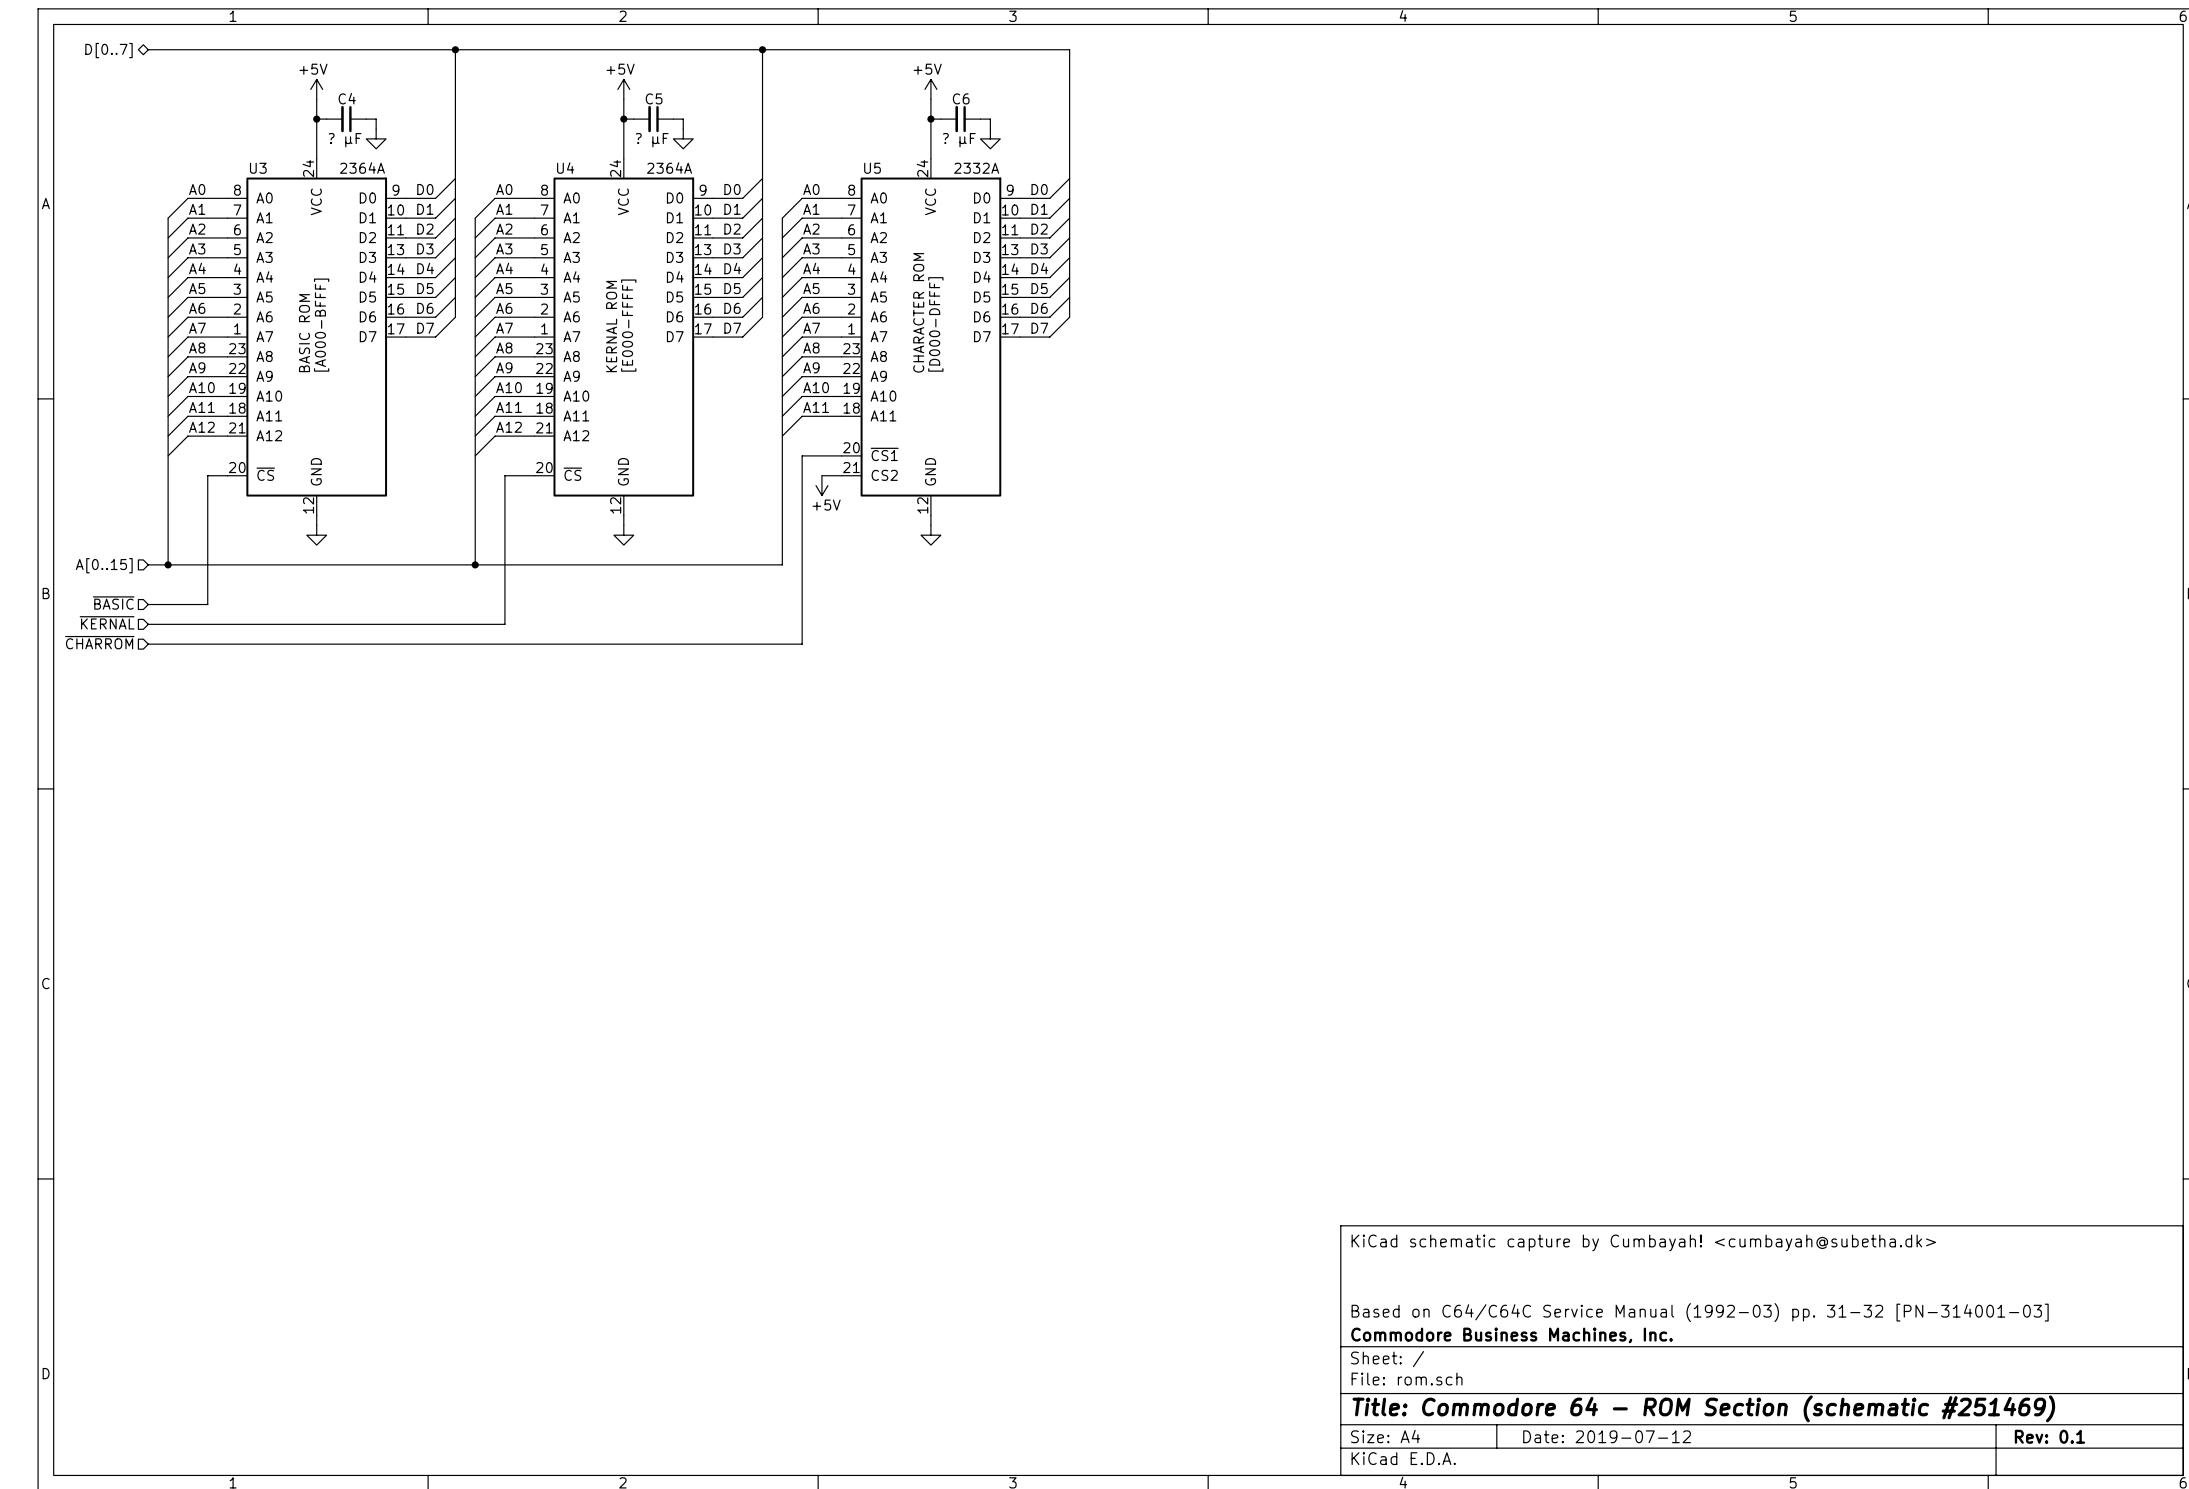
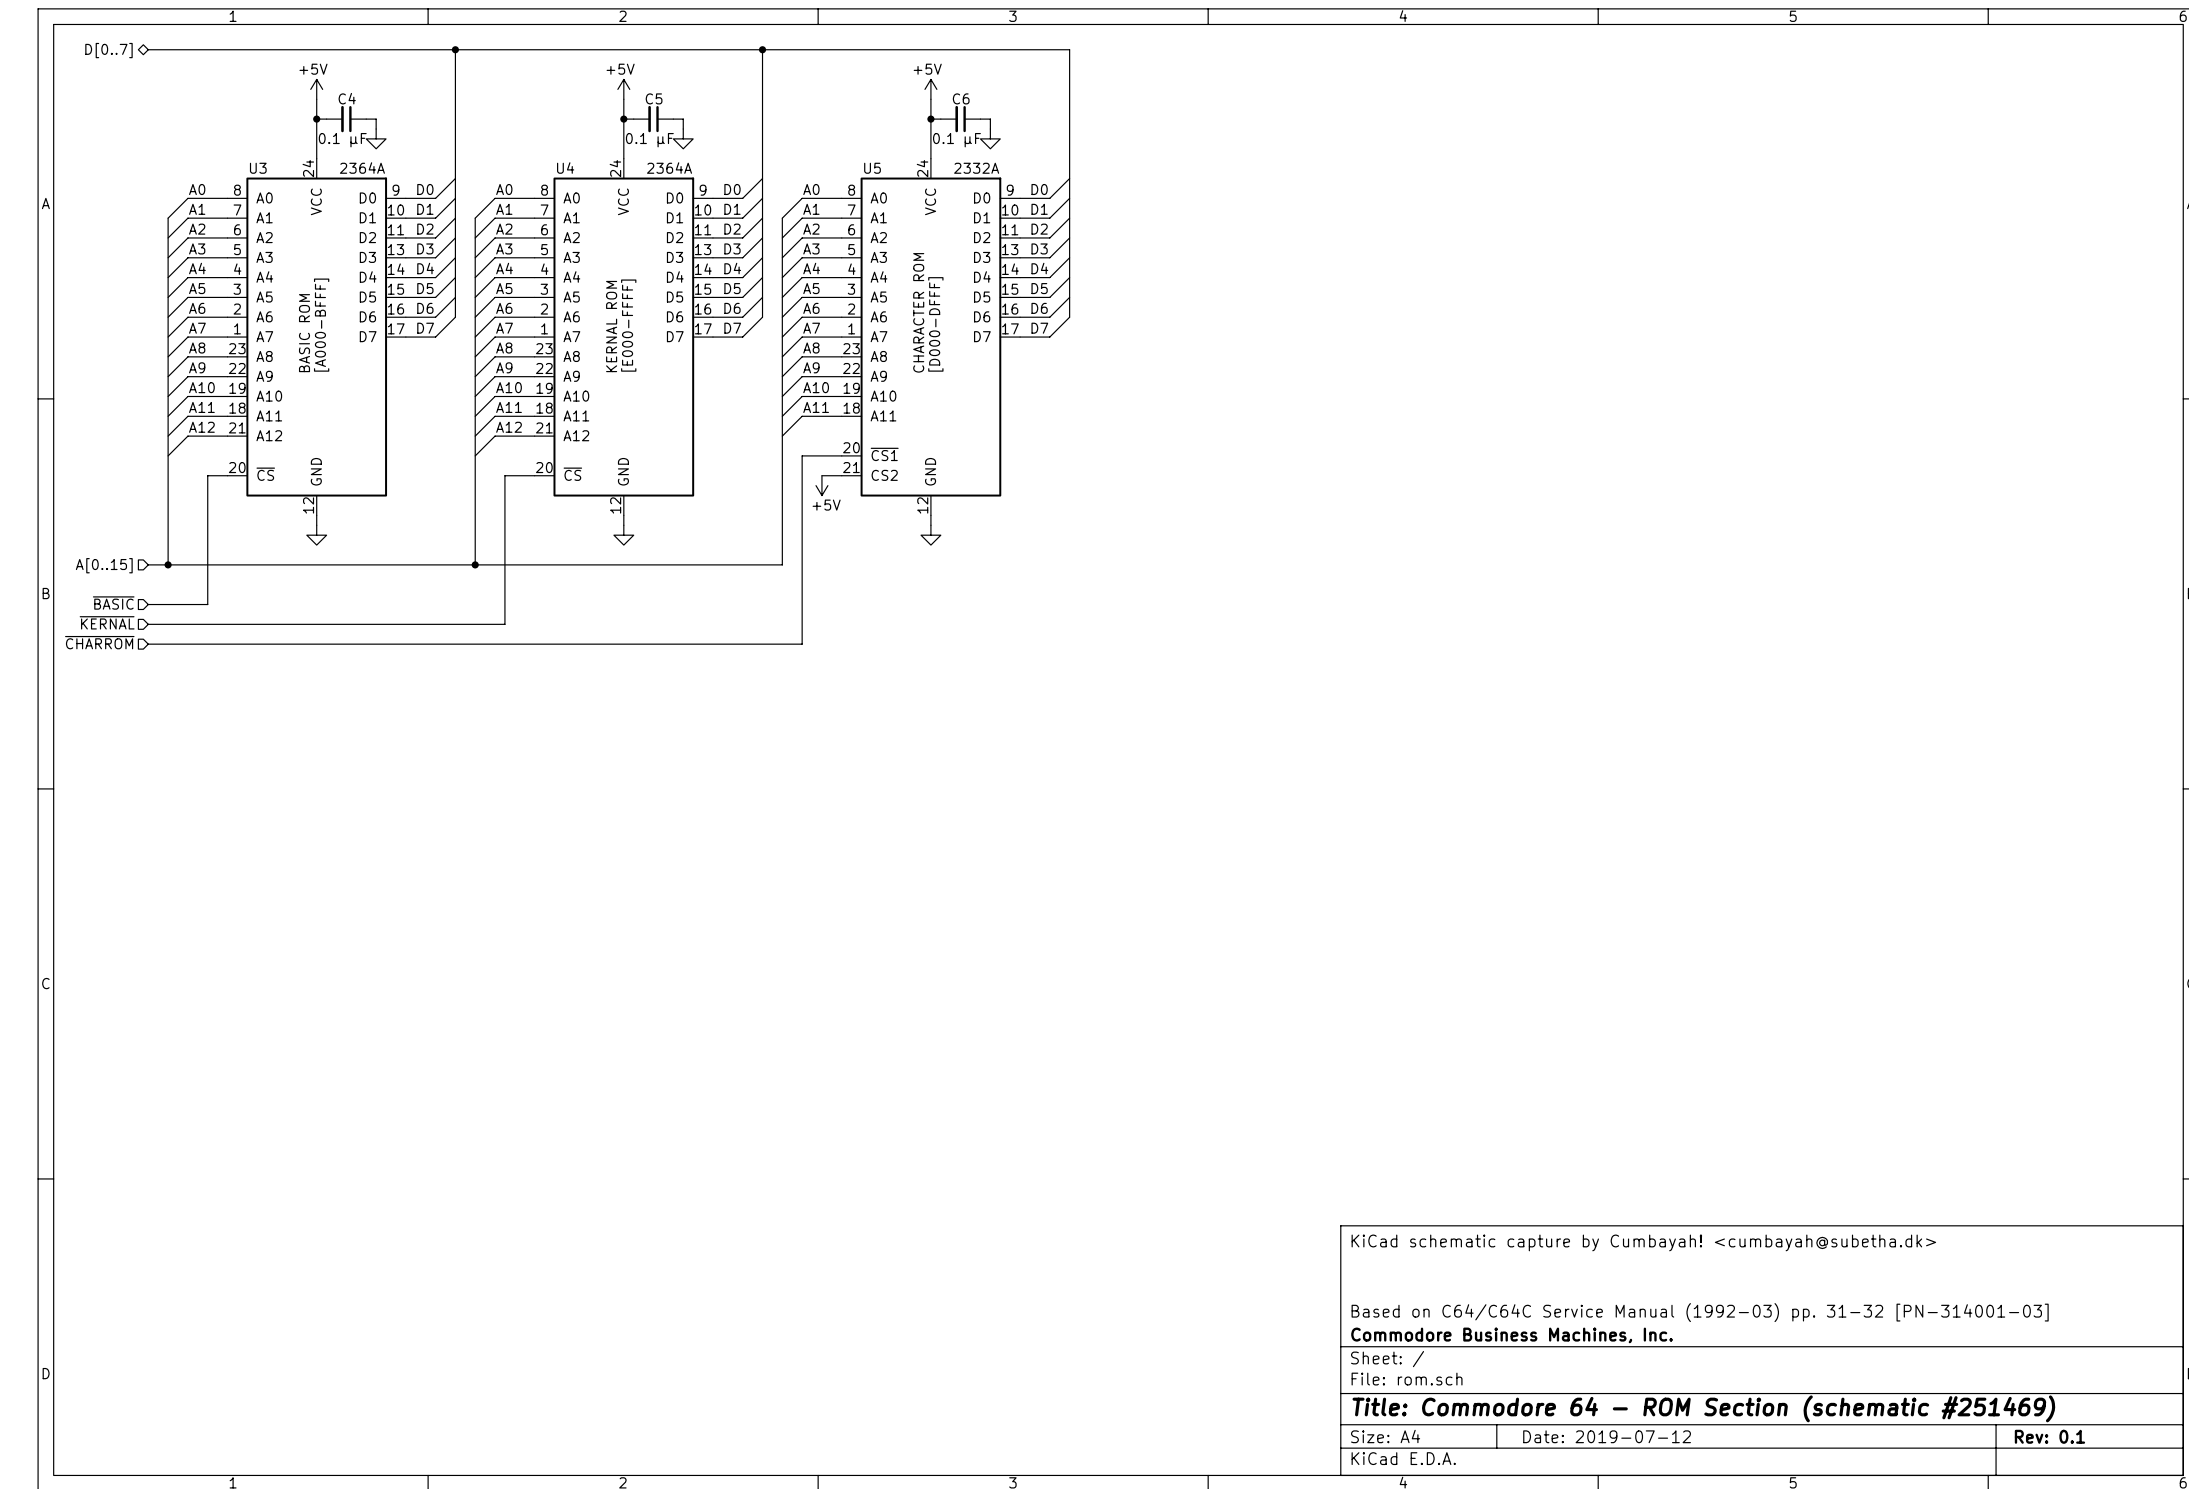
C4 value: ? μF (345, 140) -> 0.1 μF (342, 140)
C5 value: ? μF (652, 140) -> 0.1 μF (649, 140)
C6 value: ? μF (959, 140) -> 0.1 μF (956, 140)

